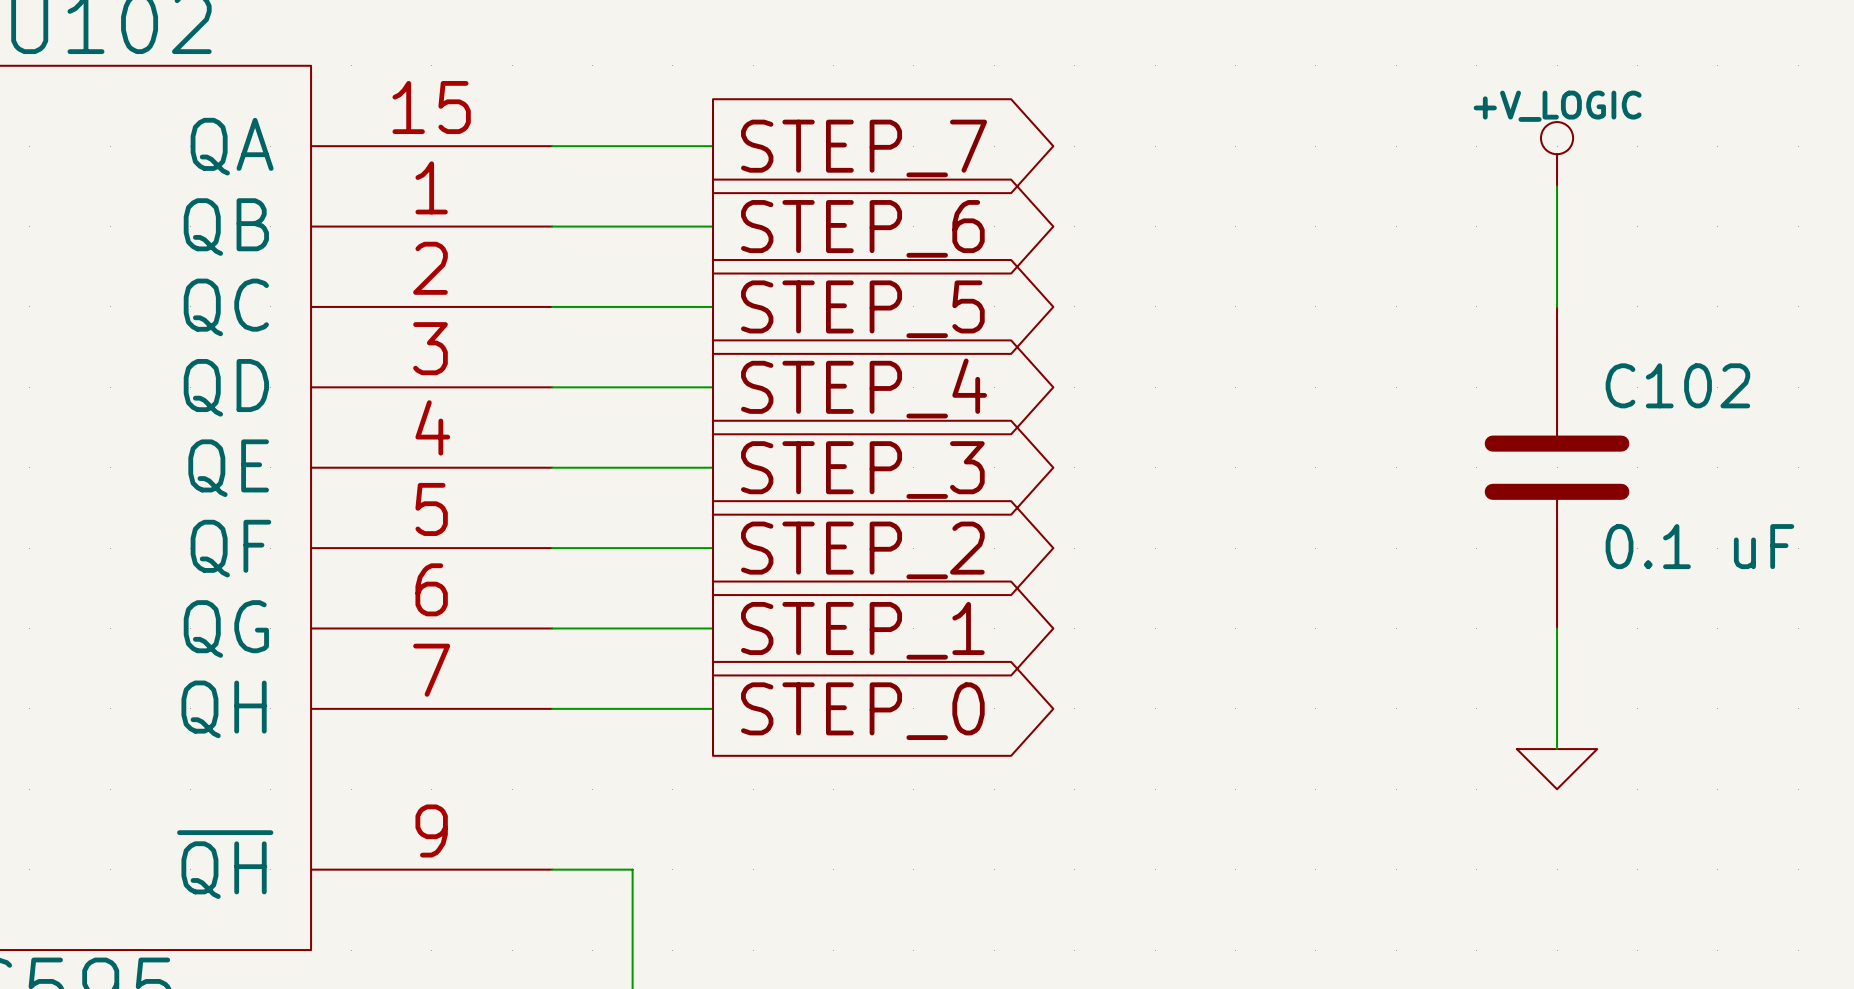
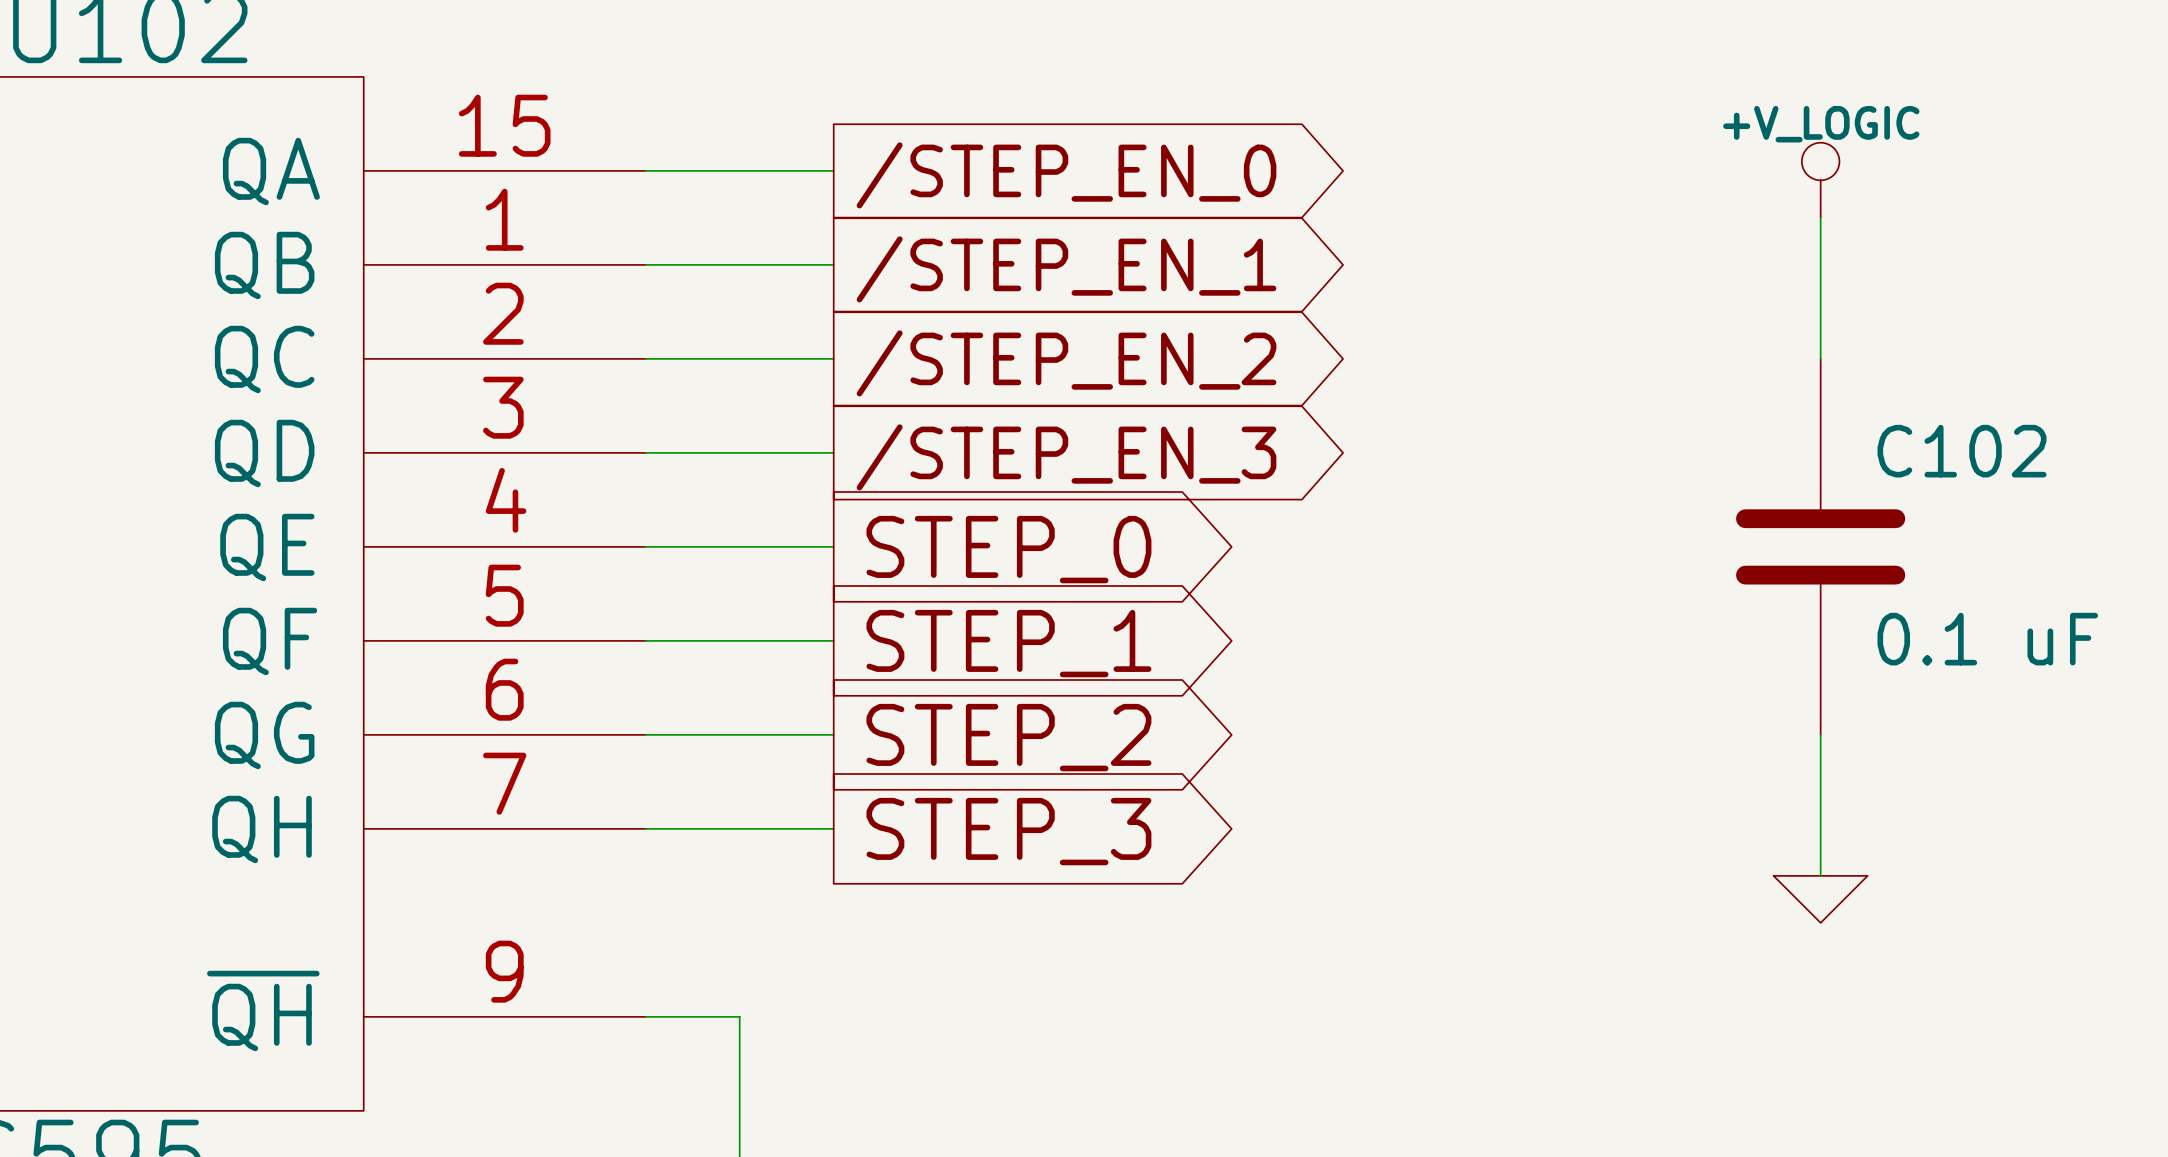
global label: STEP_7 (864, 148) -> /STEP_EN_0 (1066, 175)
global label: STEP_6 (862, 228) -> /STEP_EN_1 (1066, 269)
global label: STEP_5 (862, 309) -> /STEP_EN_2 (1066, 363)
global label: STEP_4 (864, 388) -> /STEP_EN_3 (1066, 457)
global label: STEP_3 (862, 470) -> STEP_0 (1008, 549)
global label: STEP_2 (862, 550) -> STEP_1 (1008, 643)
global label: STEP_1 (862, 630) -> STEP_2 (1008, 737)
global label: STEP_0 (862, 711) -> STEP_3 (1008, 831)

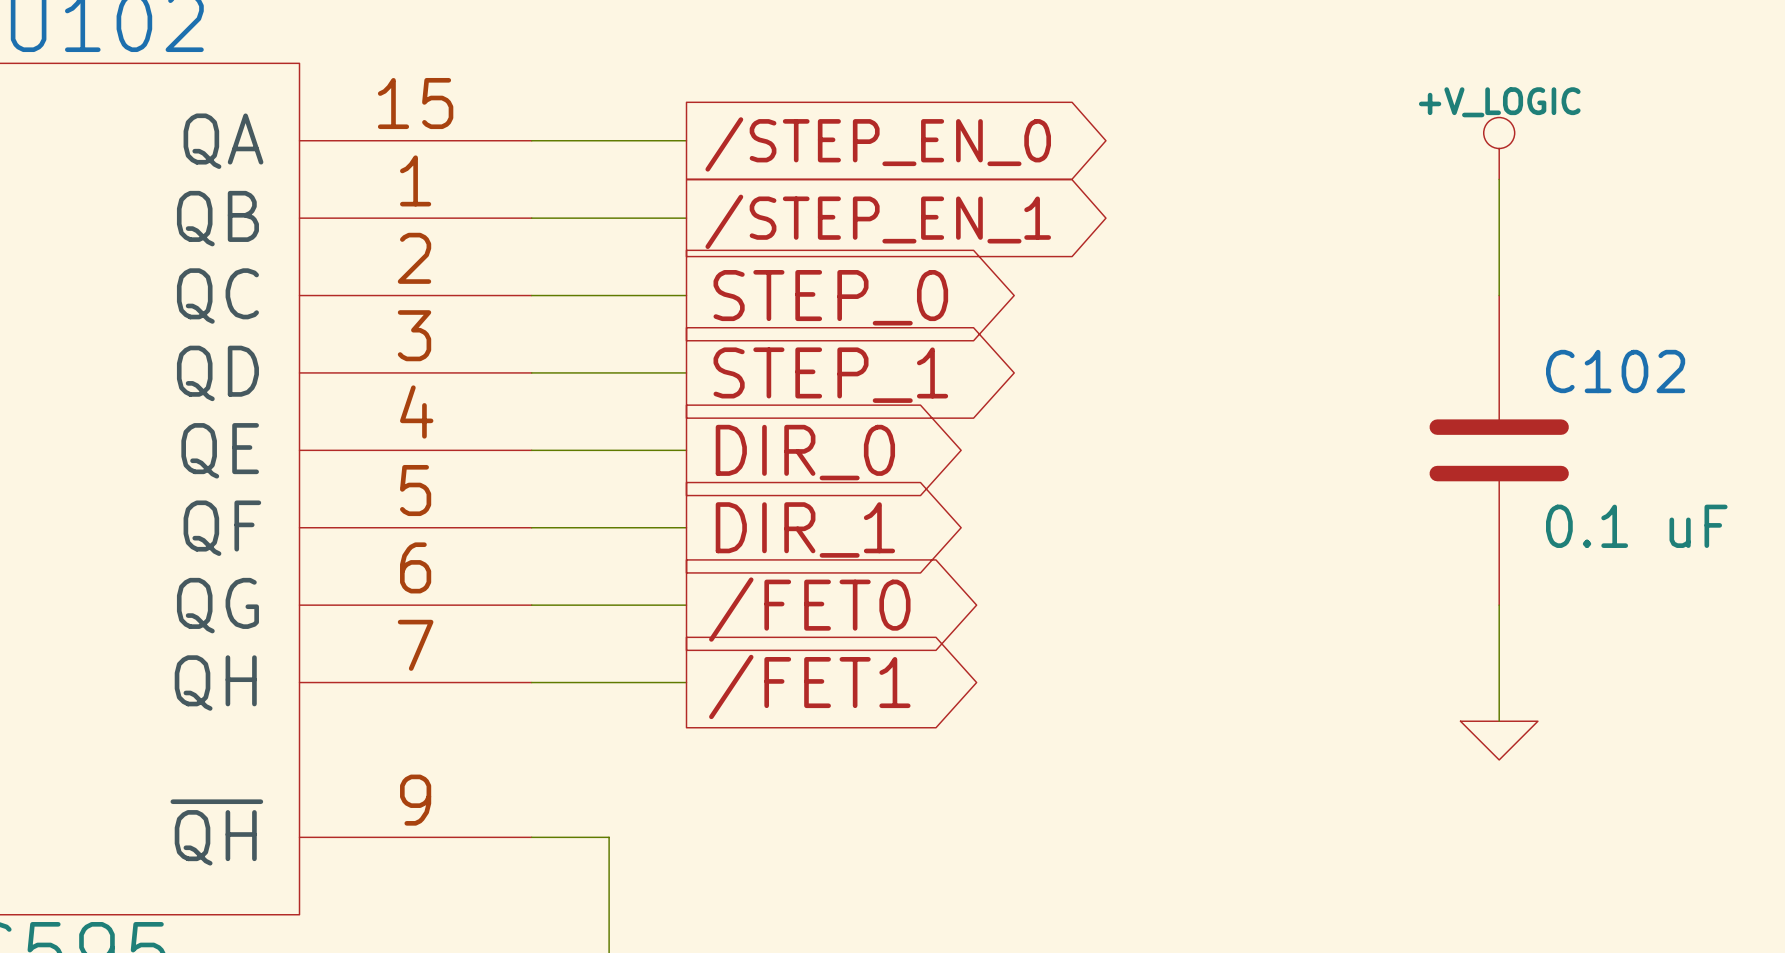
global label: /STEP_EN_2 (1066, 363) -> STEP_0 (830, 297)
global label: /STEP_EN_3 (1066, 457) -> STEP_1 (830, 375)
global label: STEP_0 (1008, 549) -> DIR_0 (805, 452)
global label: STEP_1 (1008, 643) -> DIR_1 (805, 529)
global label: STEP_2 (1008, 737) -> /FET0 (809, 609)
global label: STEP_3 (1008, 831) -> /FET1 (809, 686)

